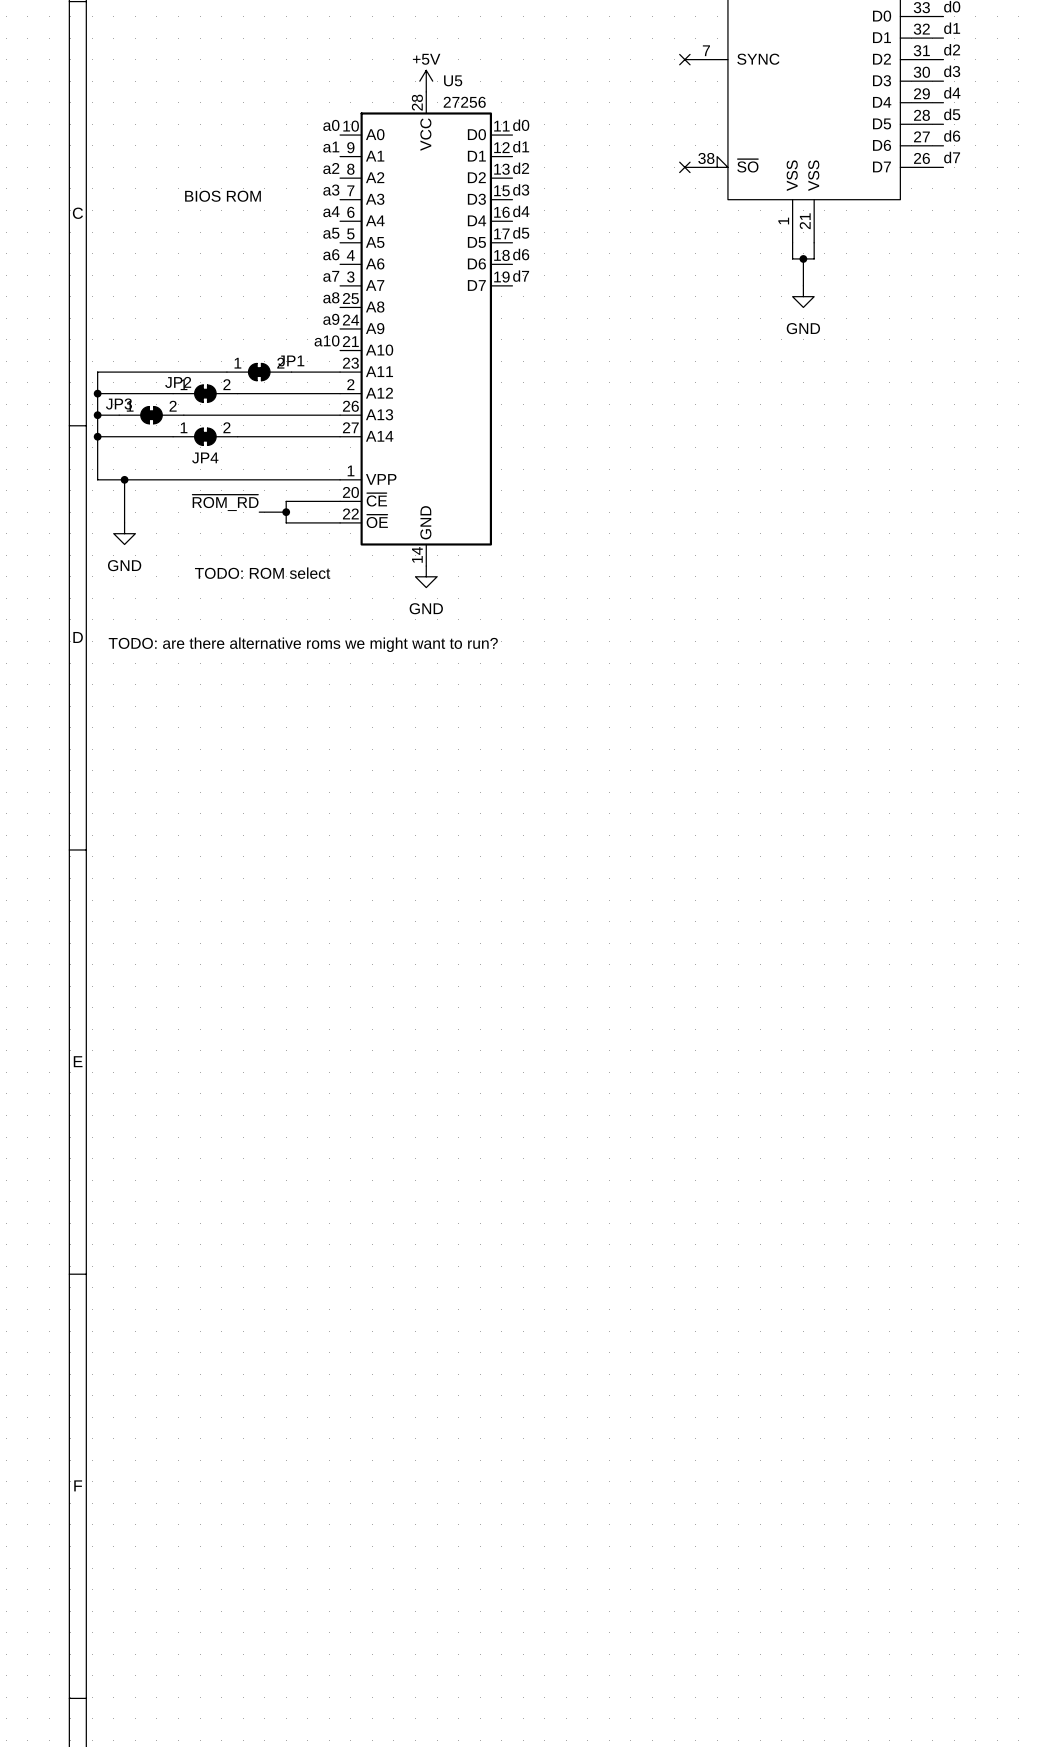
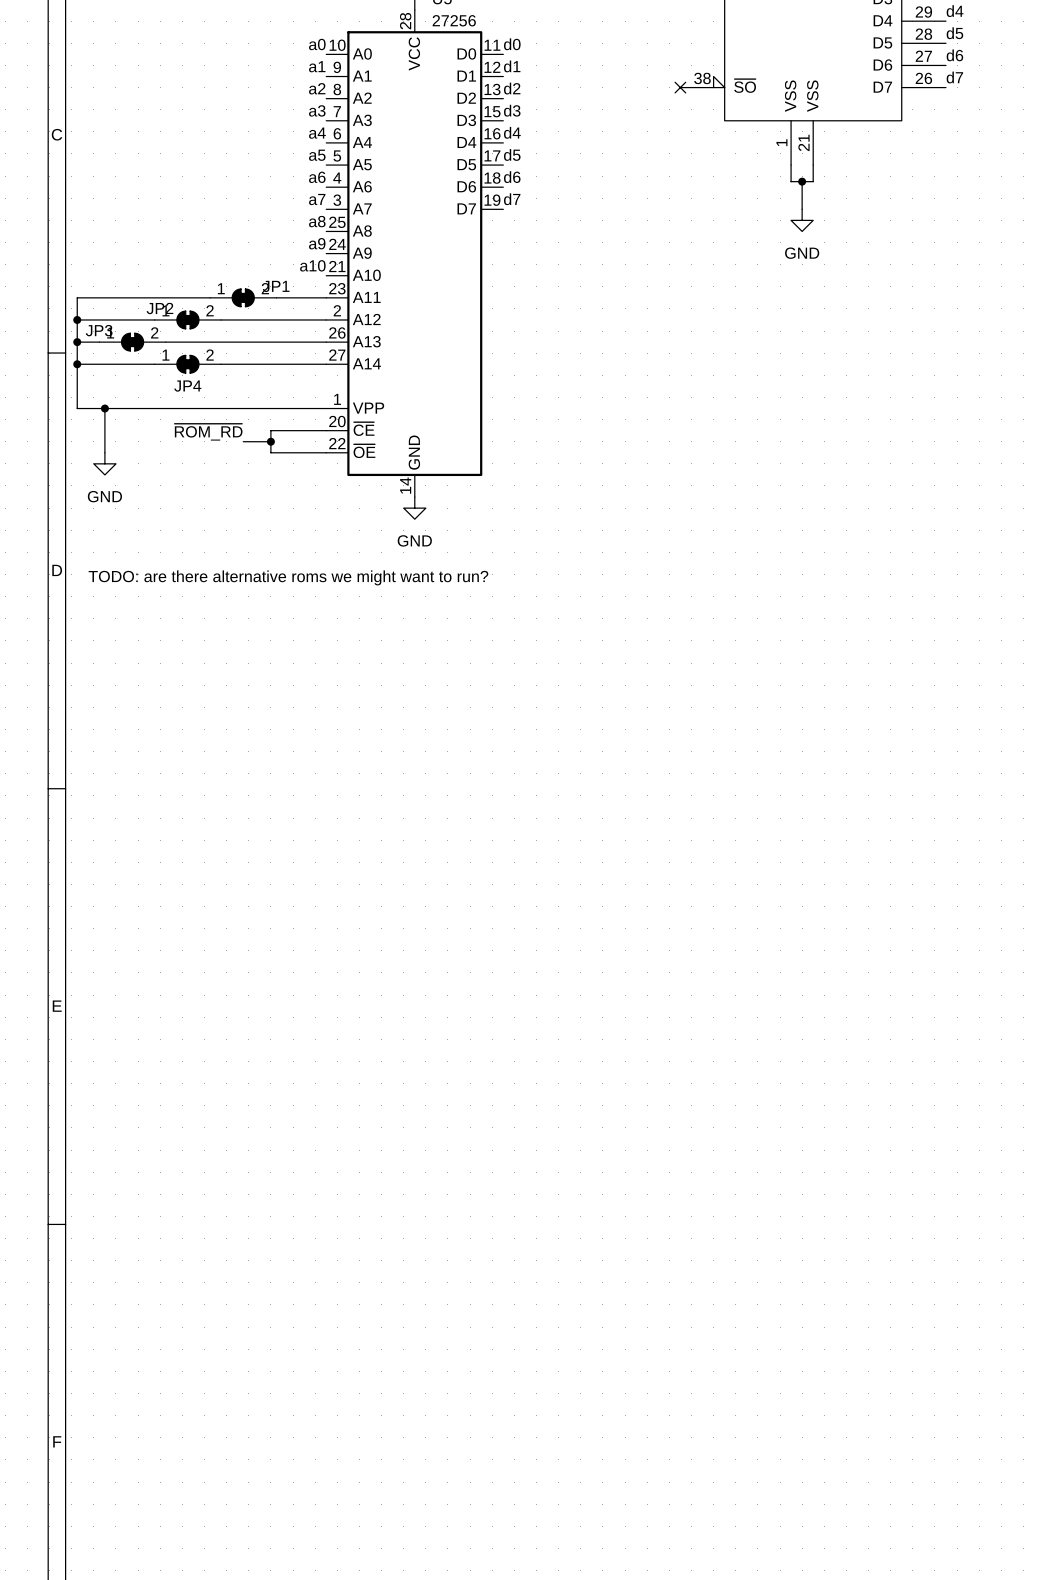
text: BIOS ROM (223, 196) -> none
text: TODO: ROM select (262, 573) -> none

